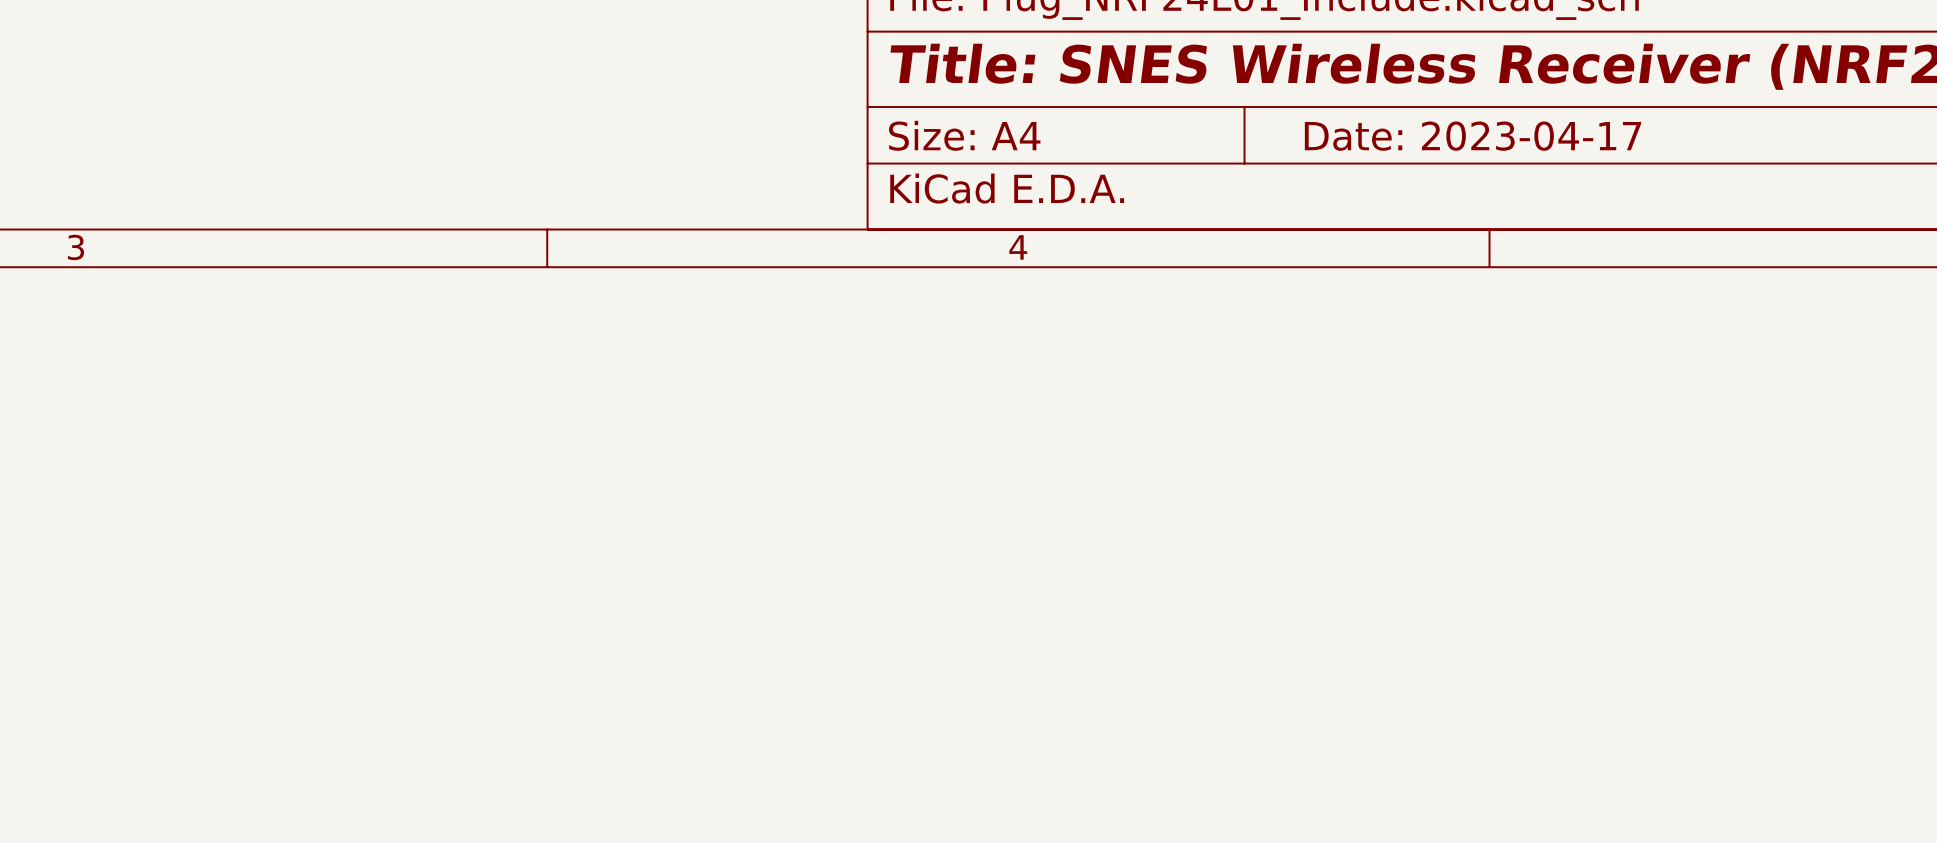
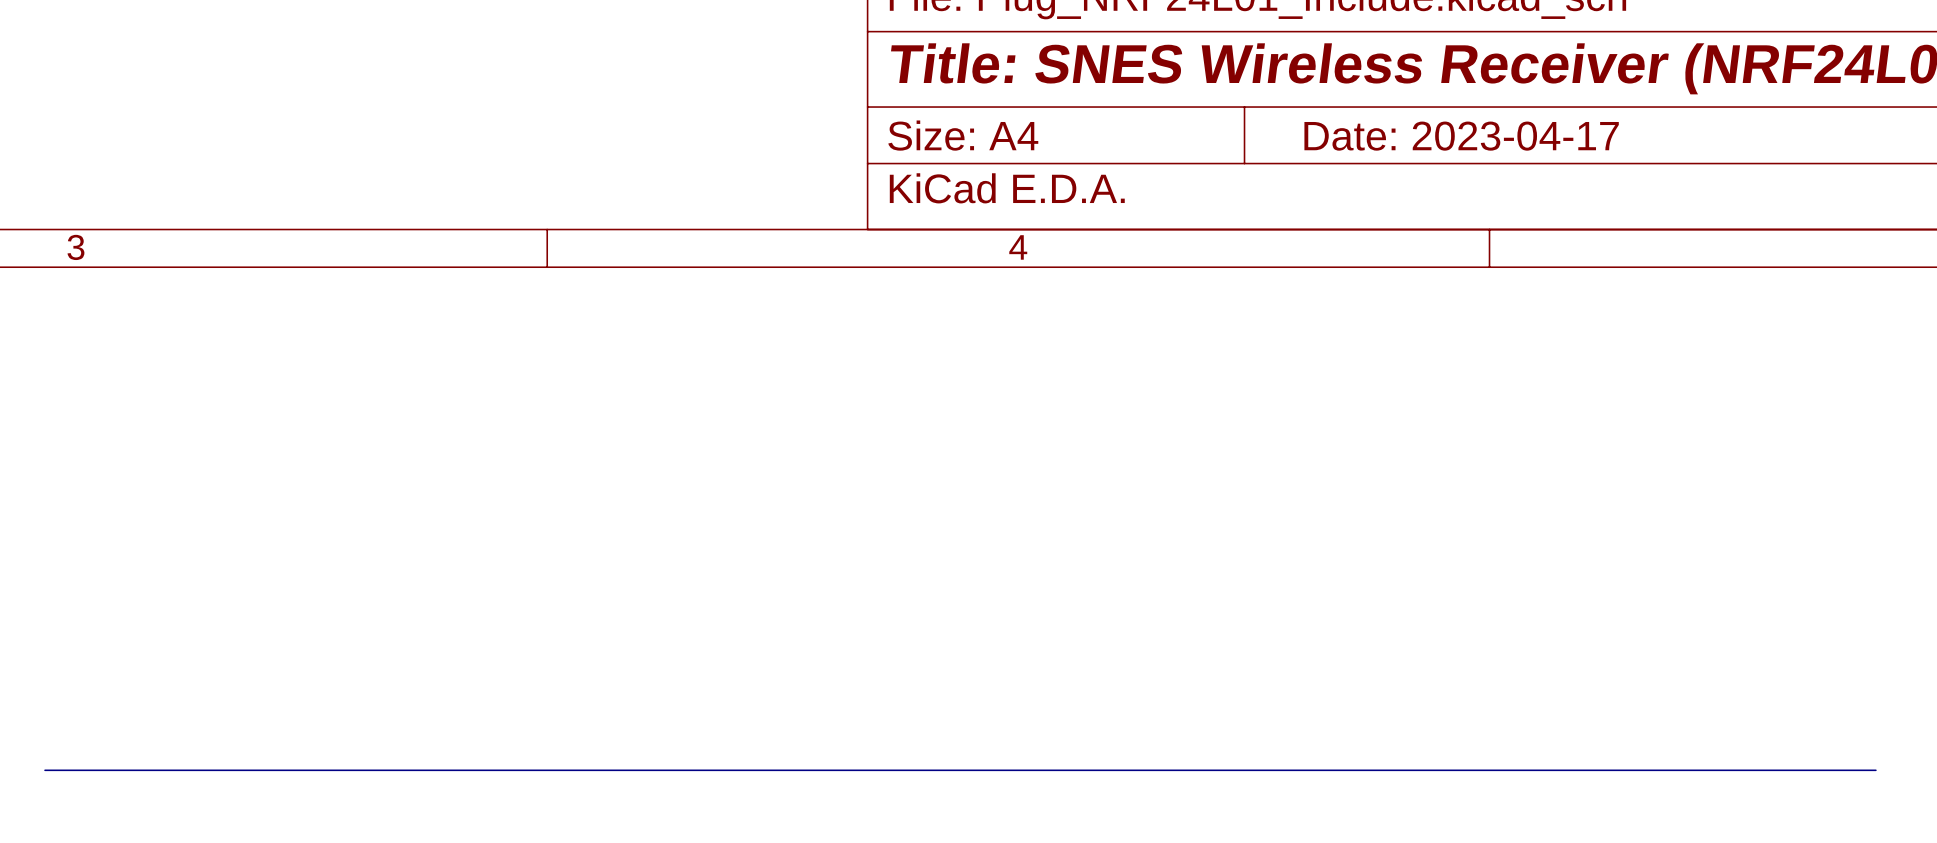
line: none -> (44, 770) (1875, 770)

